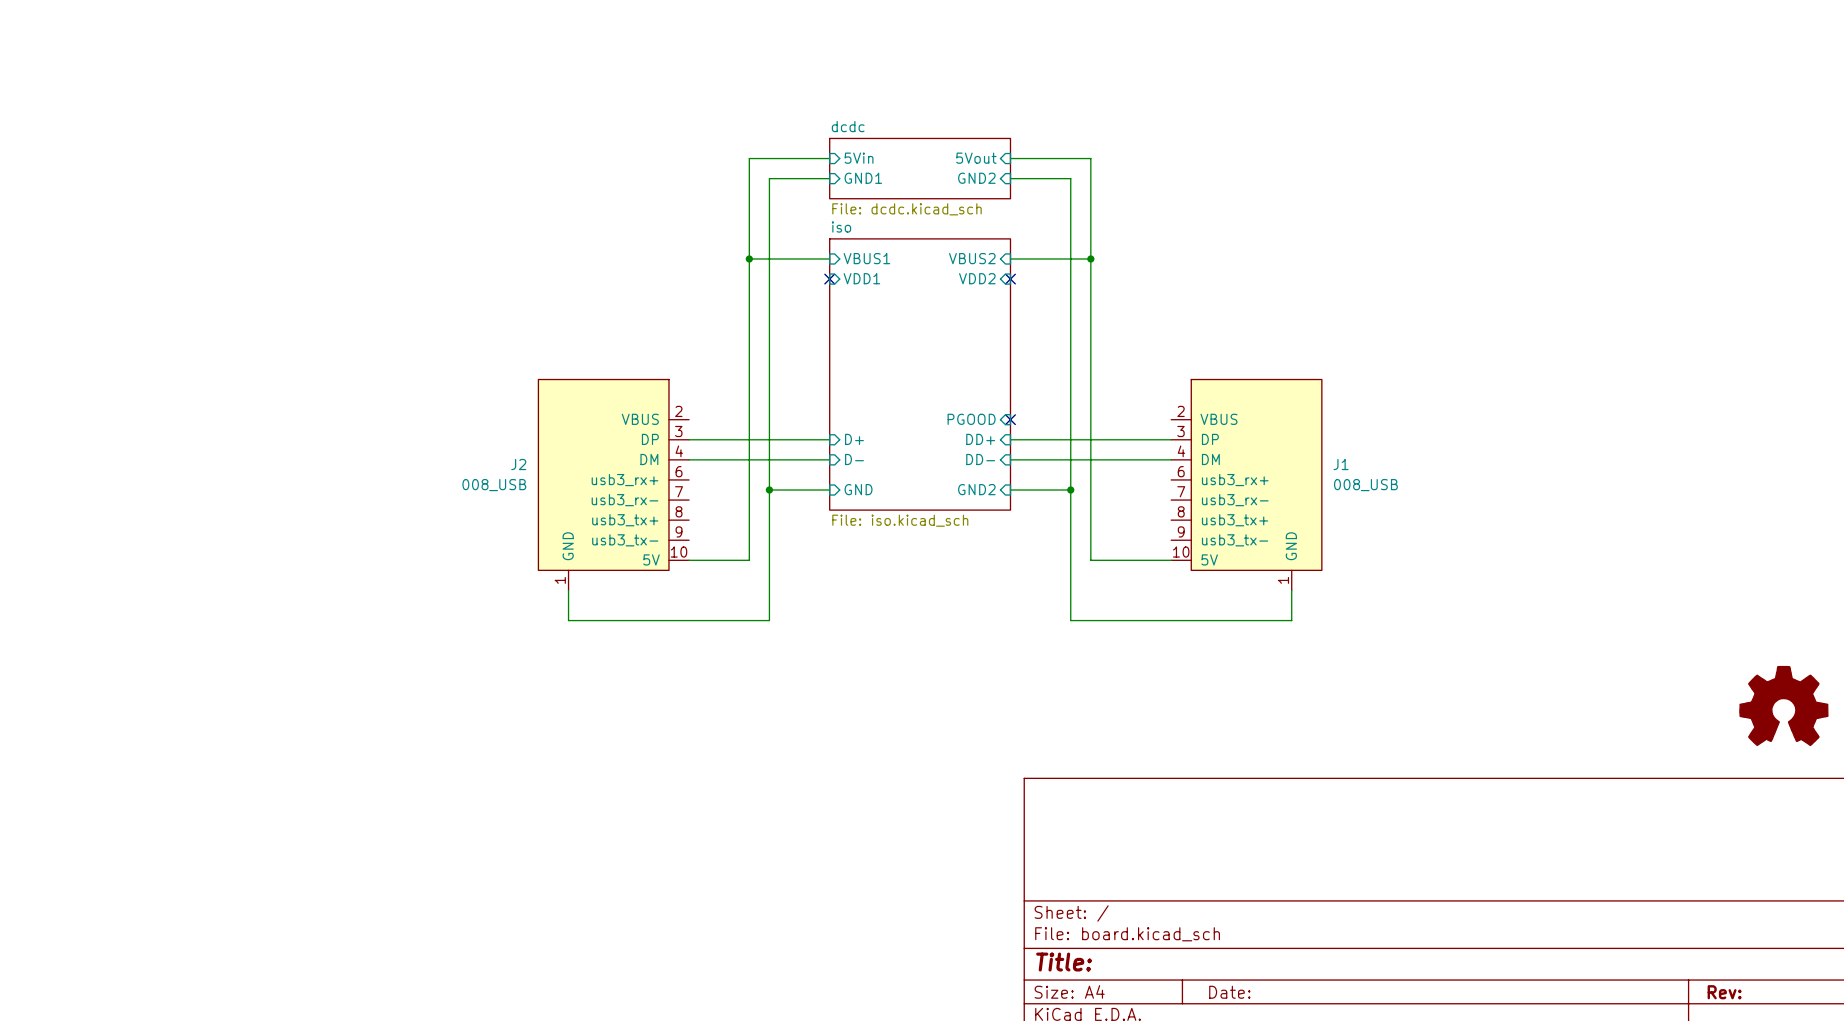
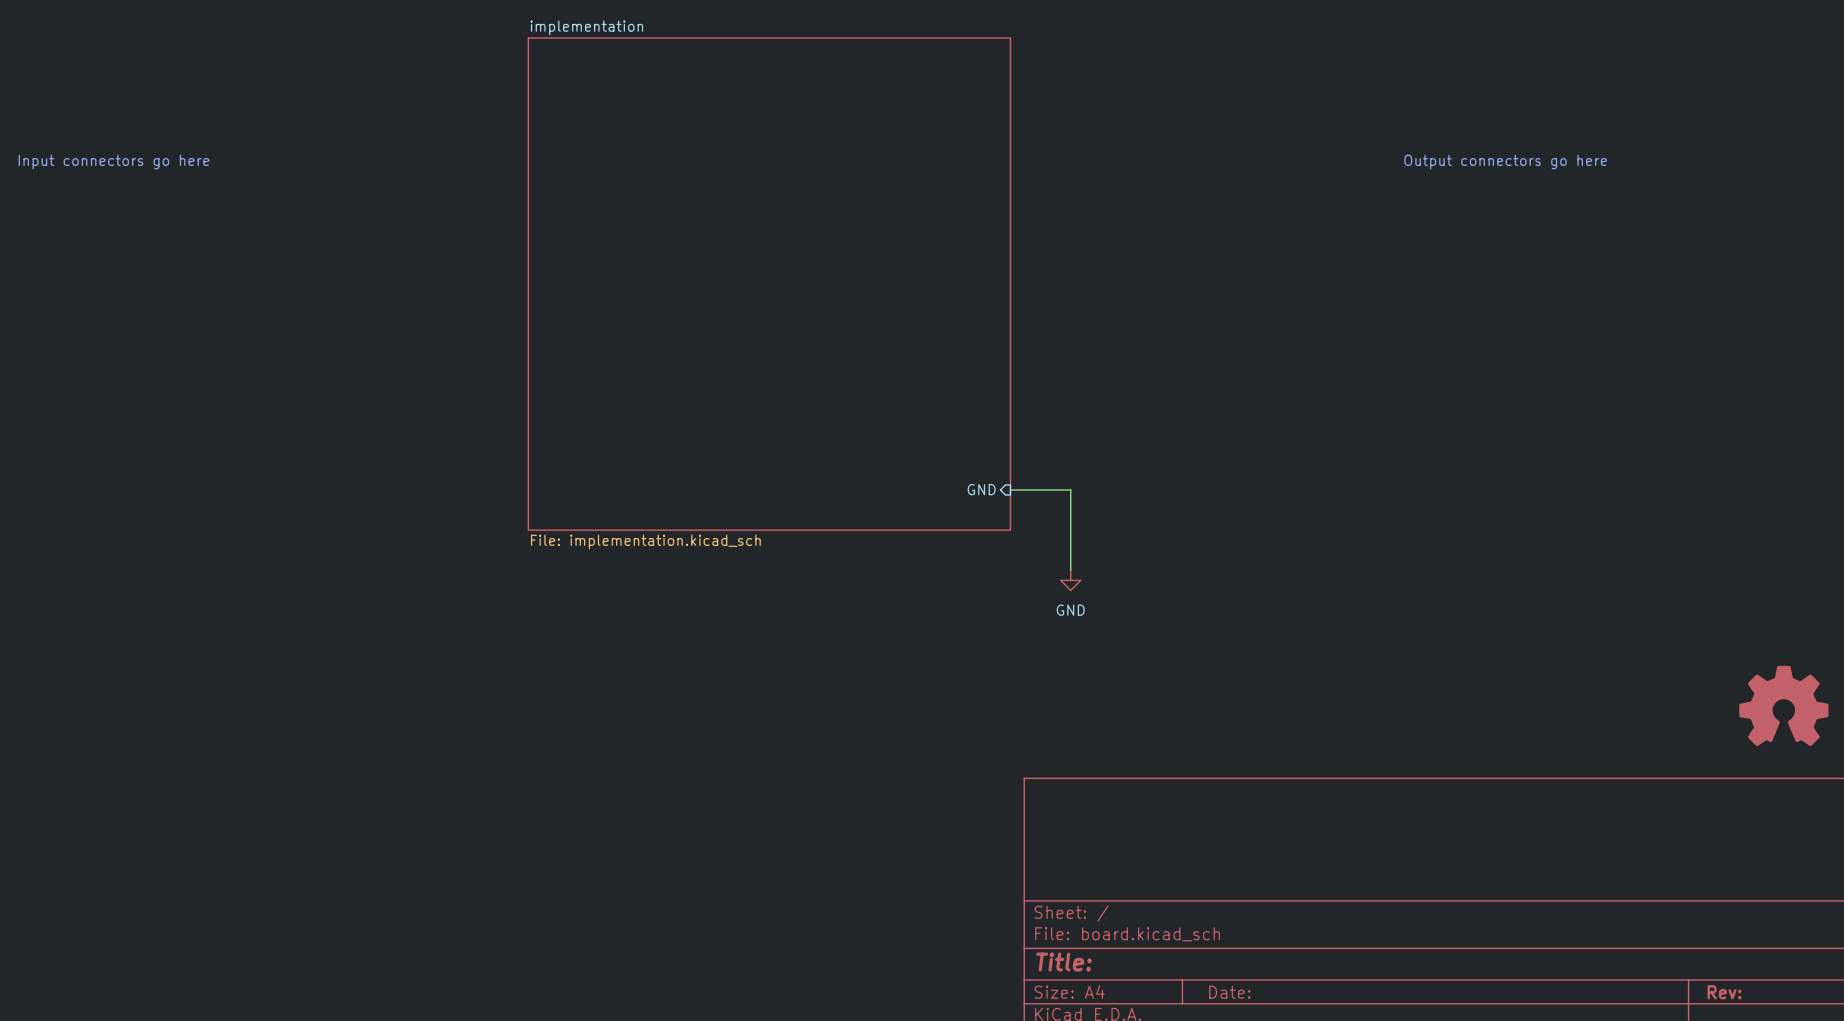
wire: (829, 158) (749, 158) (749, 560) (689, 560) -> none
sheet pin: 5Vin (859, 158) -> none
sheet pin: 5Vout (976, 158) -> none
wire: (1010, 158) (1090, 158) (1090, 560) (1171, 560) -> none
text: none -> Input connectors go here (114, 162)
text: none -> Output connectors go here (1505, 162)
sheet dcdc: File: dcdc.kicad_sch (920, 168) -> none
wire: (829, 178) (769, 178) (769, 620) (568, 620) (568, 590) -> none
sheet pin: GND1 (863, 178) -> none
sheet pin: GND2 (976, 178) -> none
wire: (1010, 178) (1070, 178) (1070, 490) -> none
wire: (749, 258) (829, 258) -> none
junction: (749, 258) -> none
sheet pin: VBUS1 (866, 258) -> none
sheet pin: VBUS2 (972, 258) -> none
wire: (1010, 258) (1090, 258) -> none
junction: (1090, 258) -> none
sheet pin: VDD1 (861, 278) -> none
sheet pin: VDD2 (977, 278) -> none
no-connect mark: (829, 279) -> none
no-connect mark: (1010, 279) -> none
sheet implementation: none -> File: implementation.kicad_sch (769, 284)
sheet iso: File: iso.kicad_sch (920, 374) -> none
sheet pin: PGOOD (971, 419) -> none
no-connect mark: (1010, 419) -> none
wire: (689, 439) (829, 439) -> none
sheet pin: D+ (854, 439) -> none
sheet pin: DD+ (980, 439) -> none
wire: (1010, 439) (1171, 439) -> none
wire: (689, 459) (829, 459) -> none
sheet pin: D- (854, 459) -> none
sheet pin: DD- (980, 459) -> none
wire: (1010, 459) (1171, 459) -> none
J2: 008_USB (613, 484) -> none
J1: 008_USB (1246, 484) -> none
sheet pin: GND (858, 489) -> none
sheet pin: GND2 (976, 489) -> GND (981, 489)
wire: (769, 490) (829, 490) -> none
junction: (769, 490) -> none
junction: (1070, 490) -> none
wire: (1070, 570) (1070, 620) (1291, 620) (1291, 590) -> none
power symbol: none -> GND (1070, 580)

